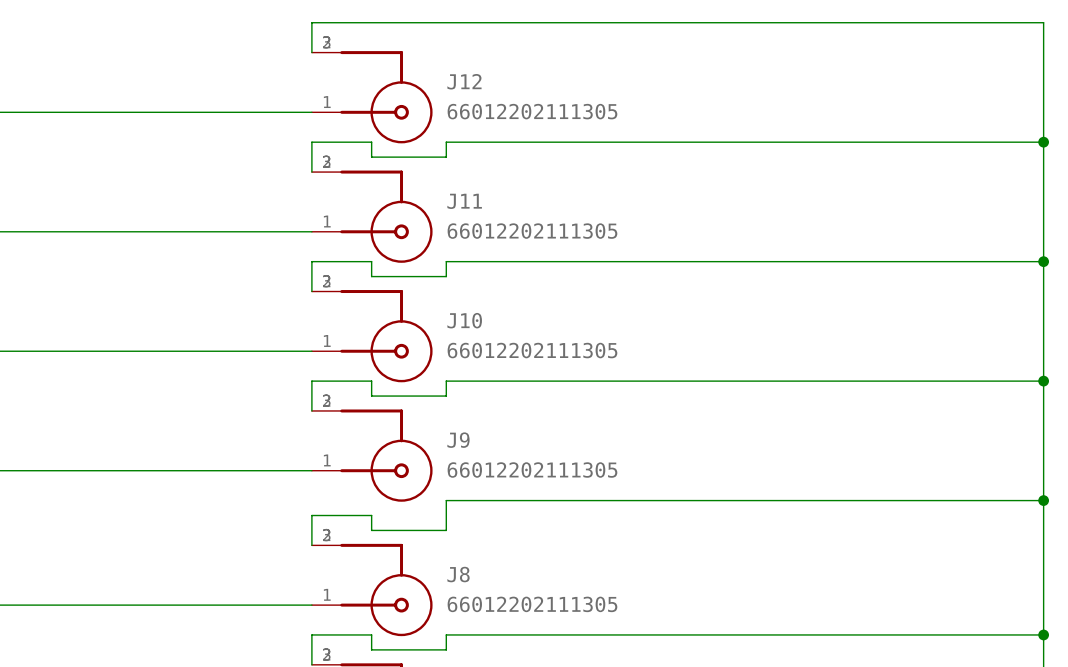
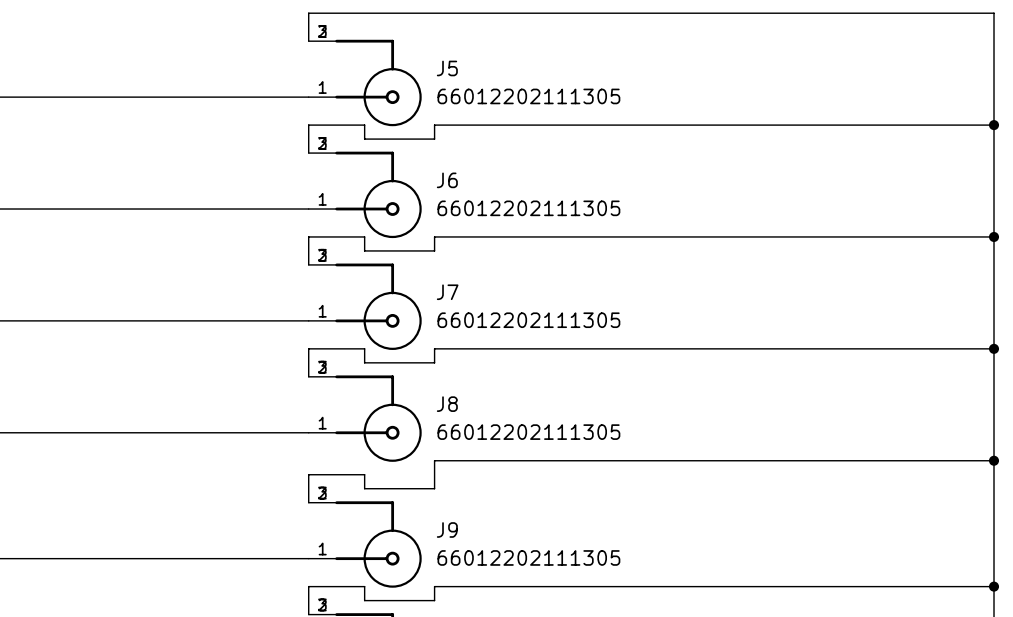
J12 name: J12 (464, 81) -> J5 (447, 68)
J11 name: J11 (464, 201) -> J6 (447, 180)
J10 name: J10 (464, 320) -> J7 (447, 292)
J9 name: J9 (458, 440) -> J8 (447, 404)
J8 name: J8 (458, 574) -> J9 (447, 530)

